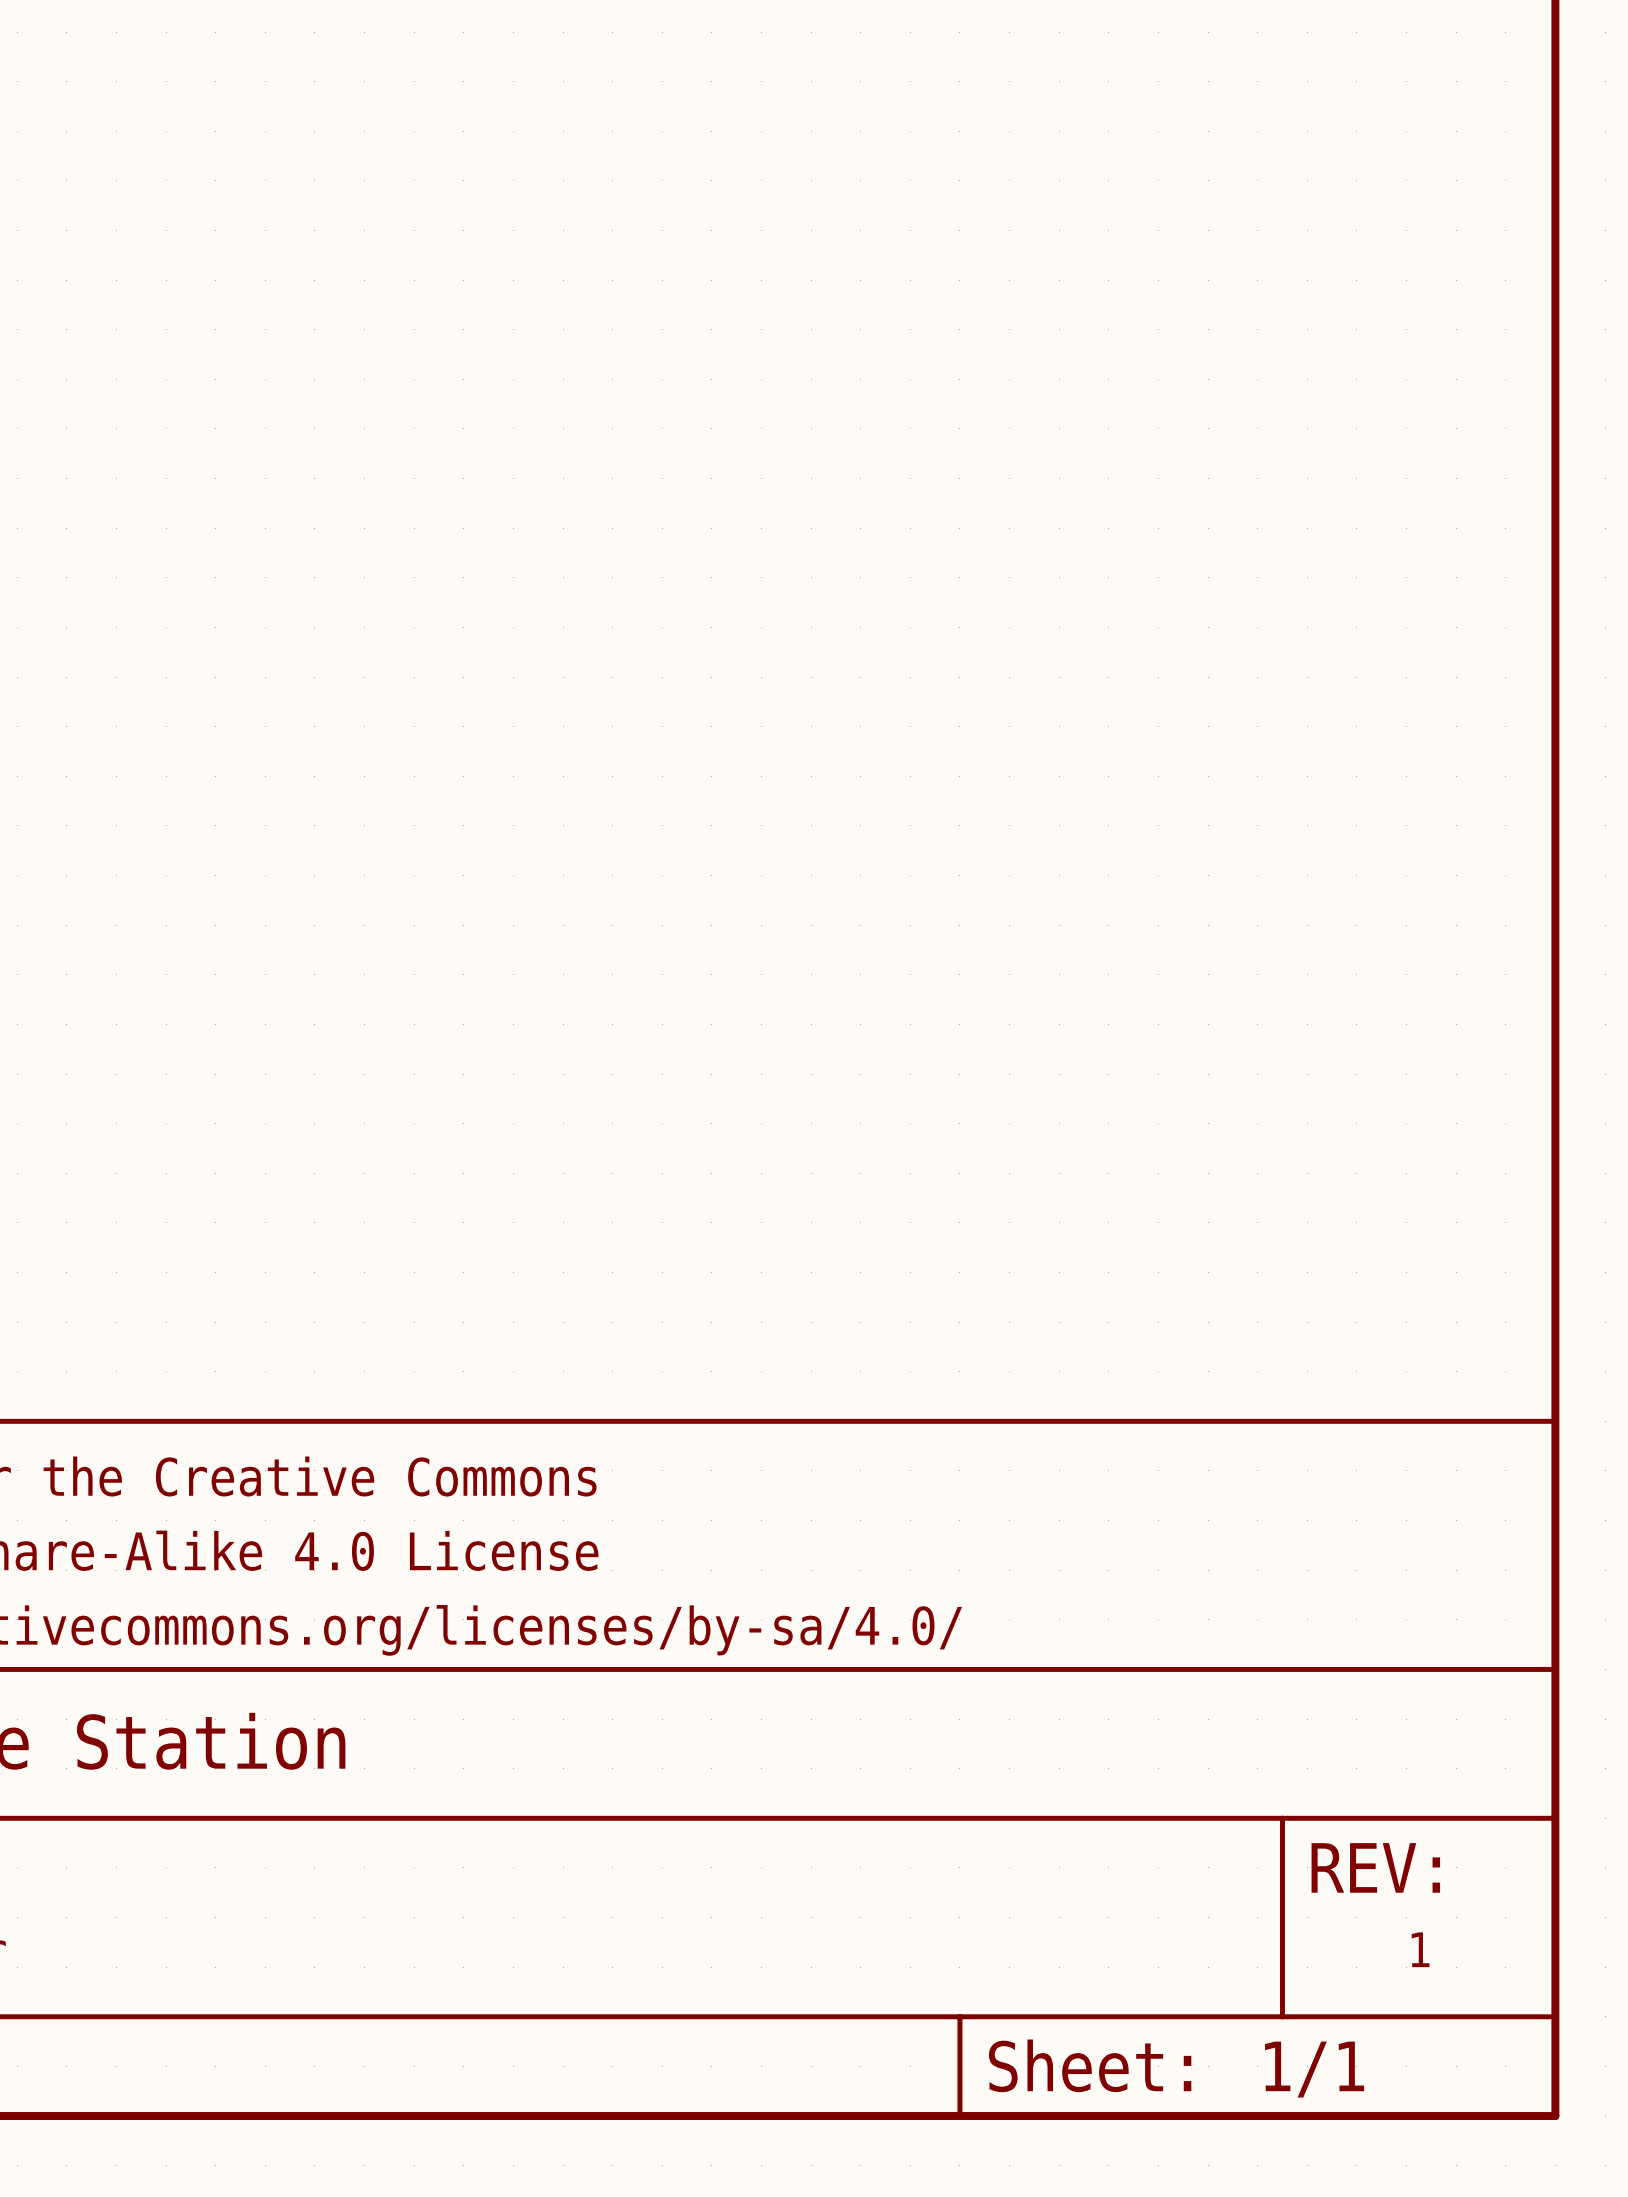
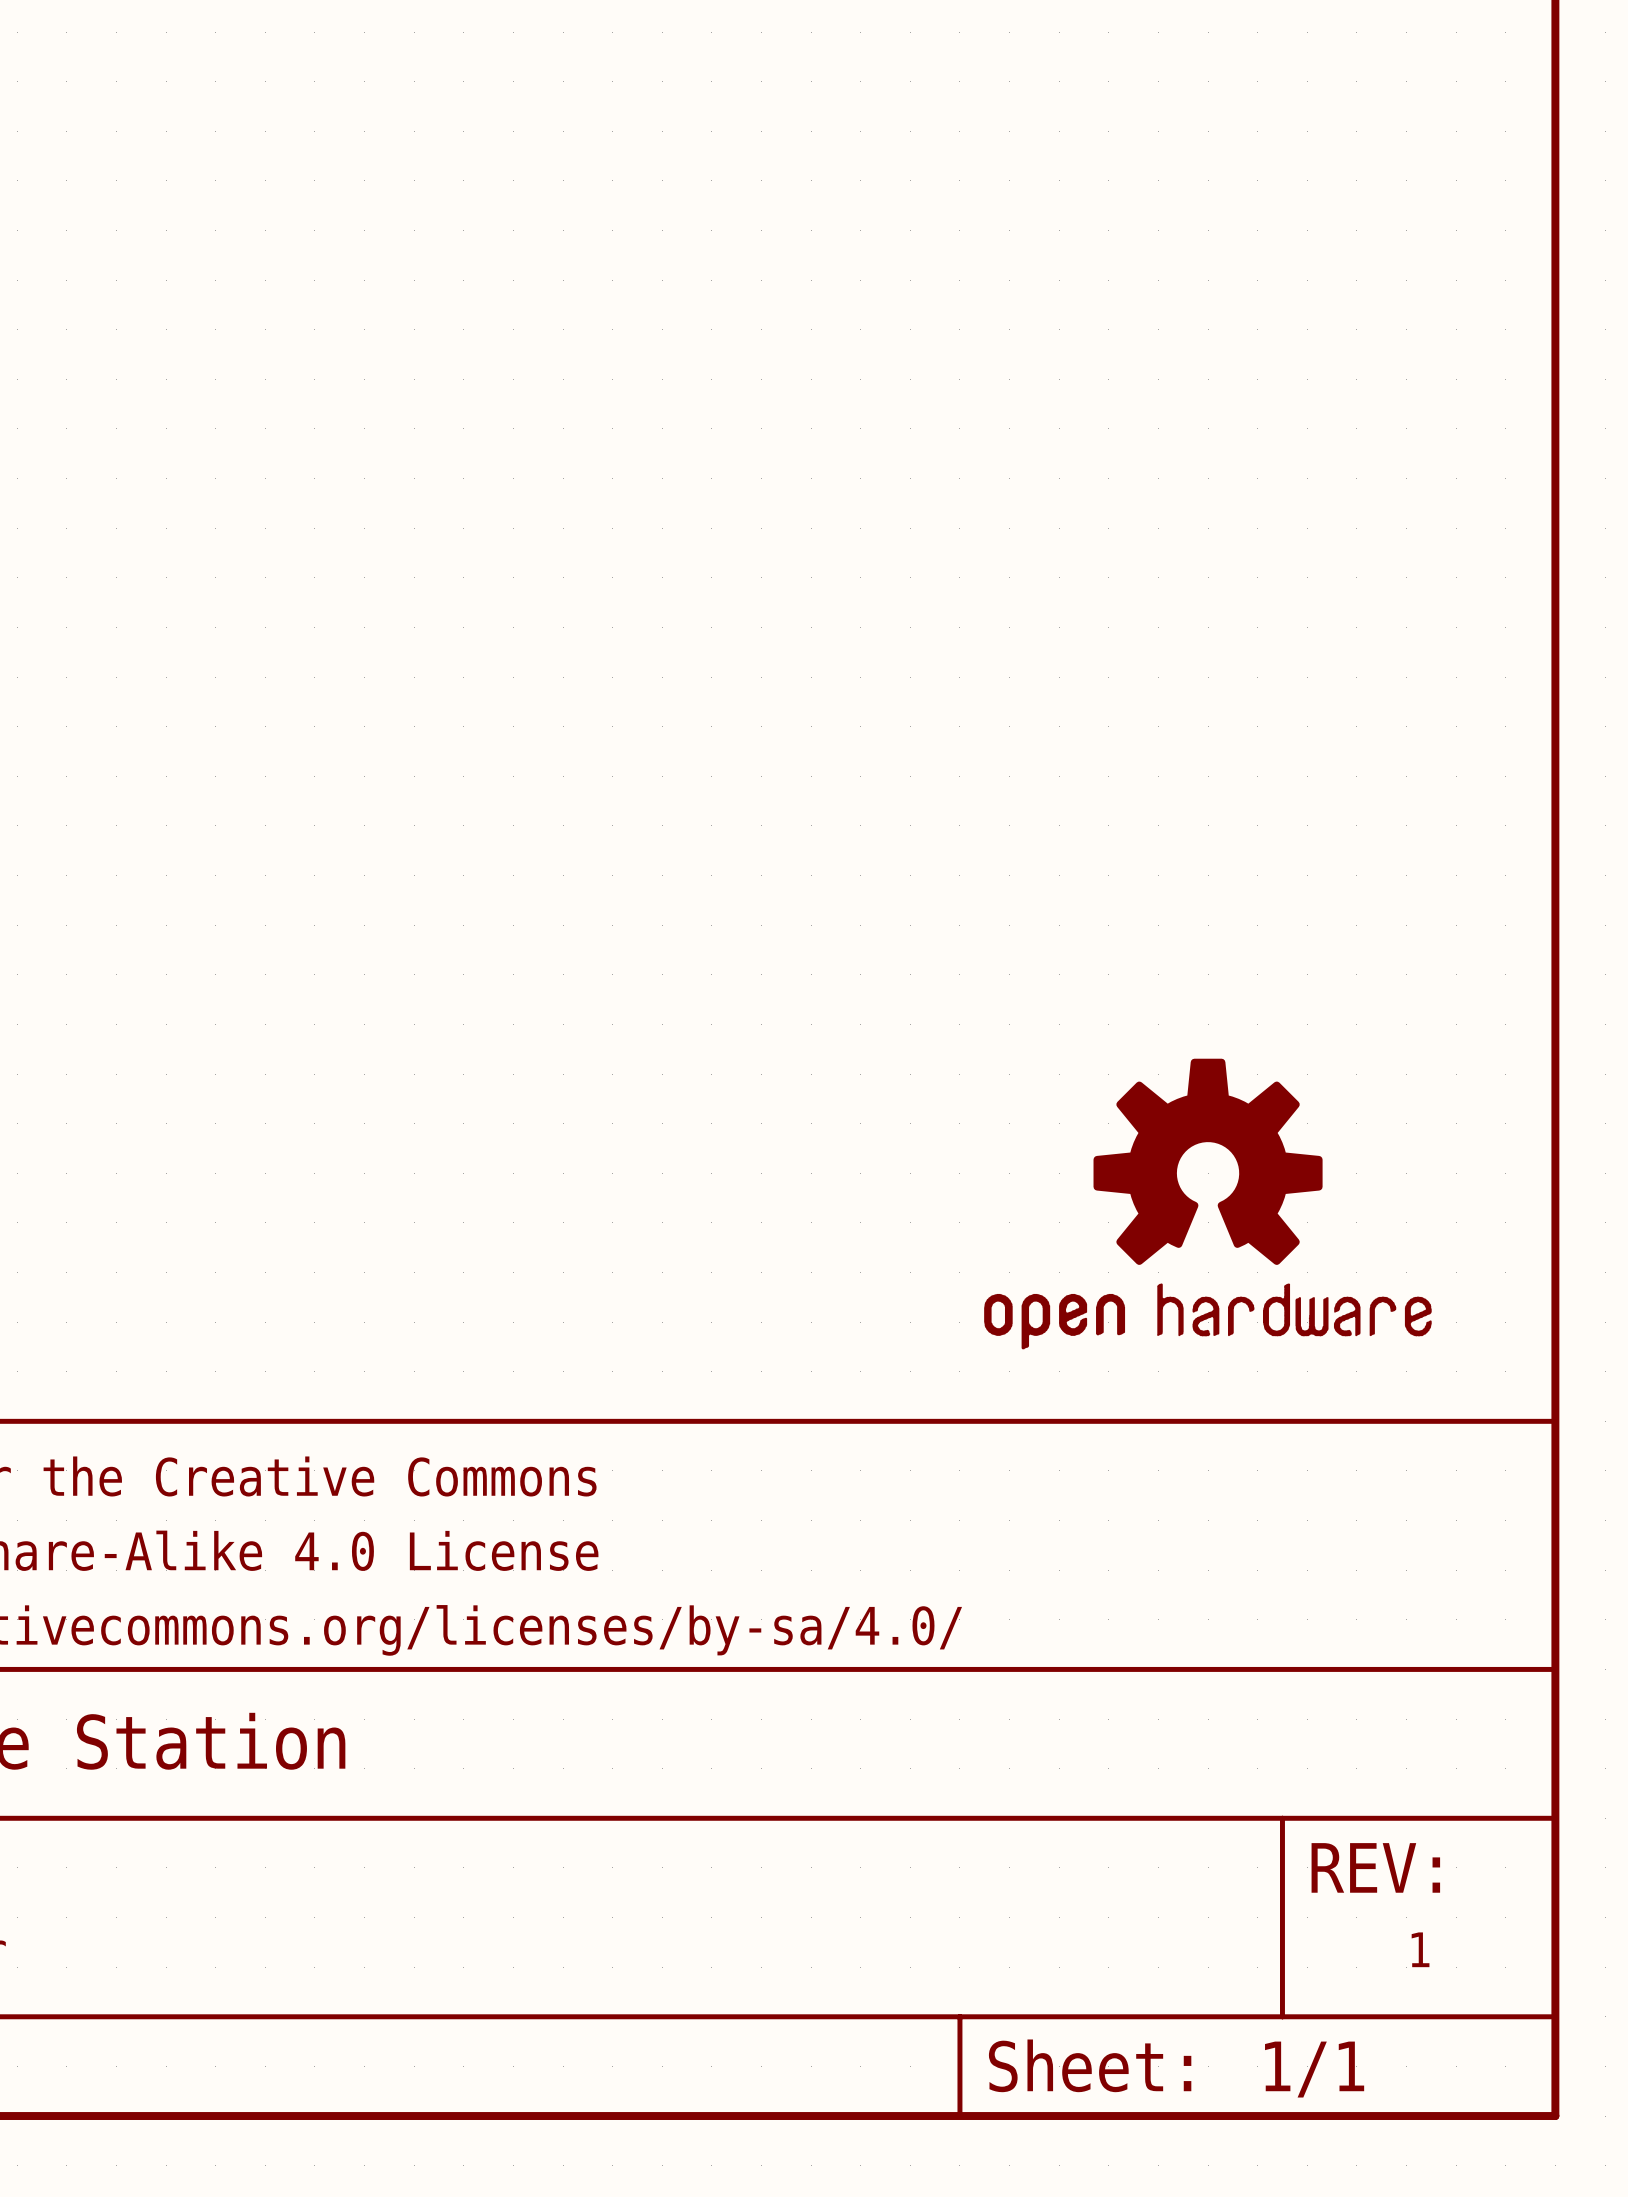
part: none -> (1207, 1203)

